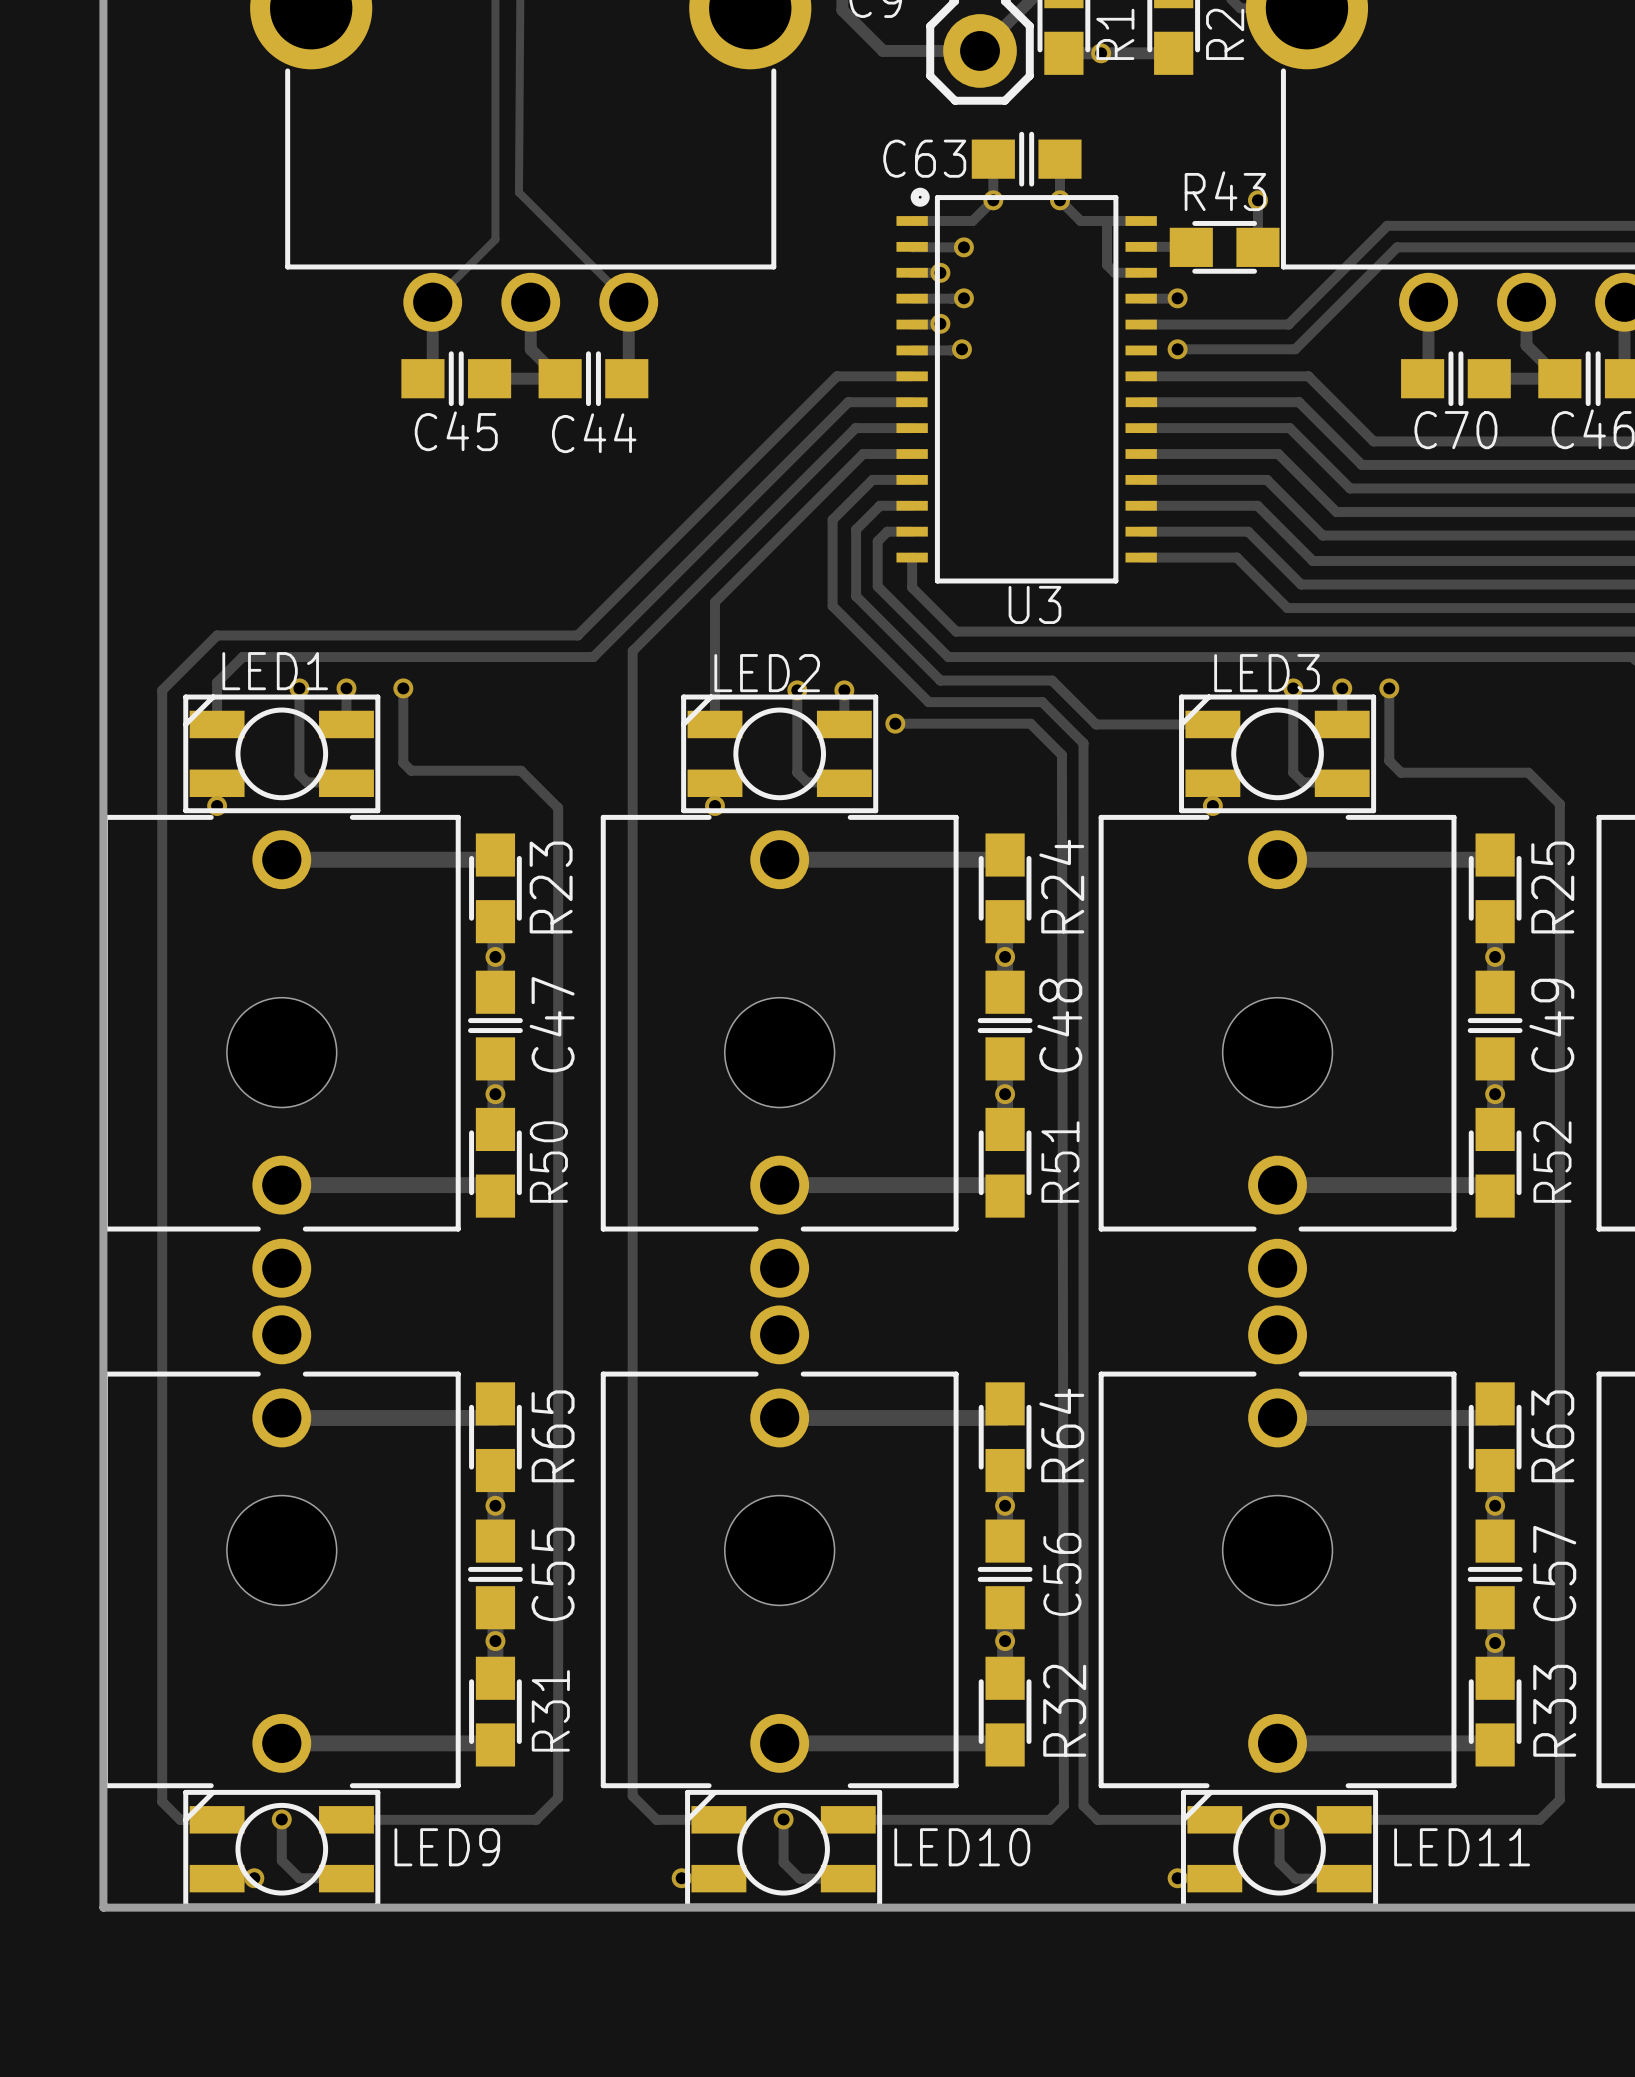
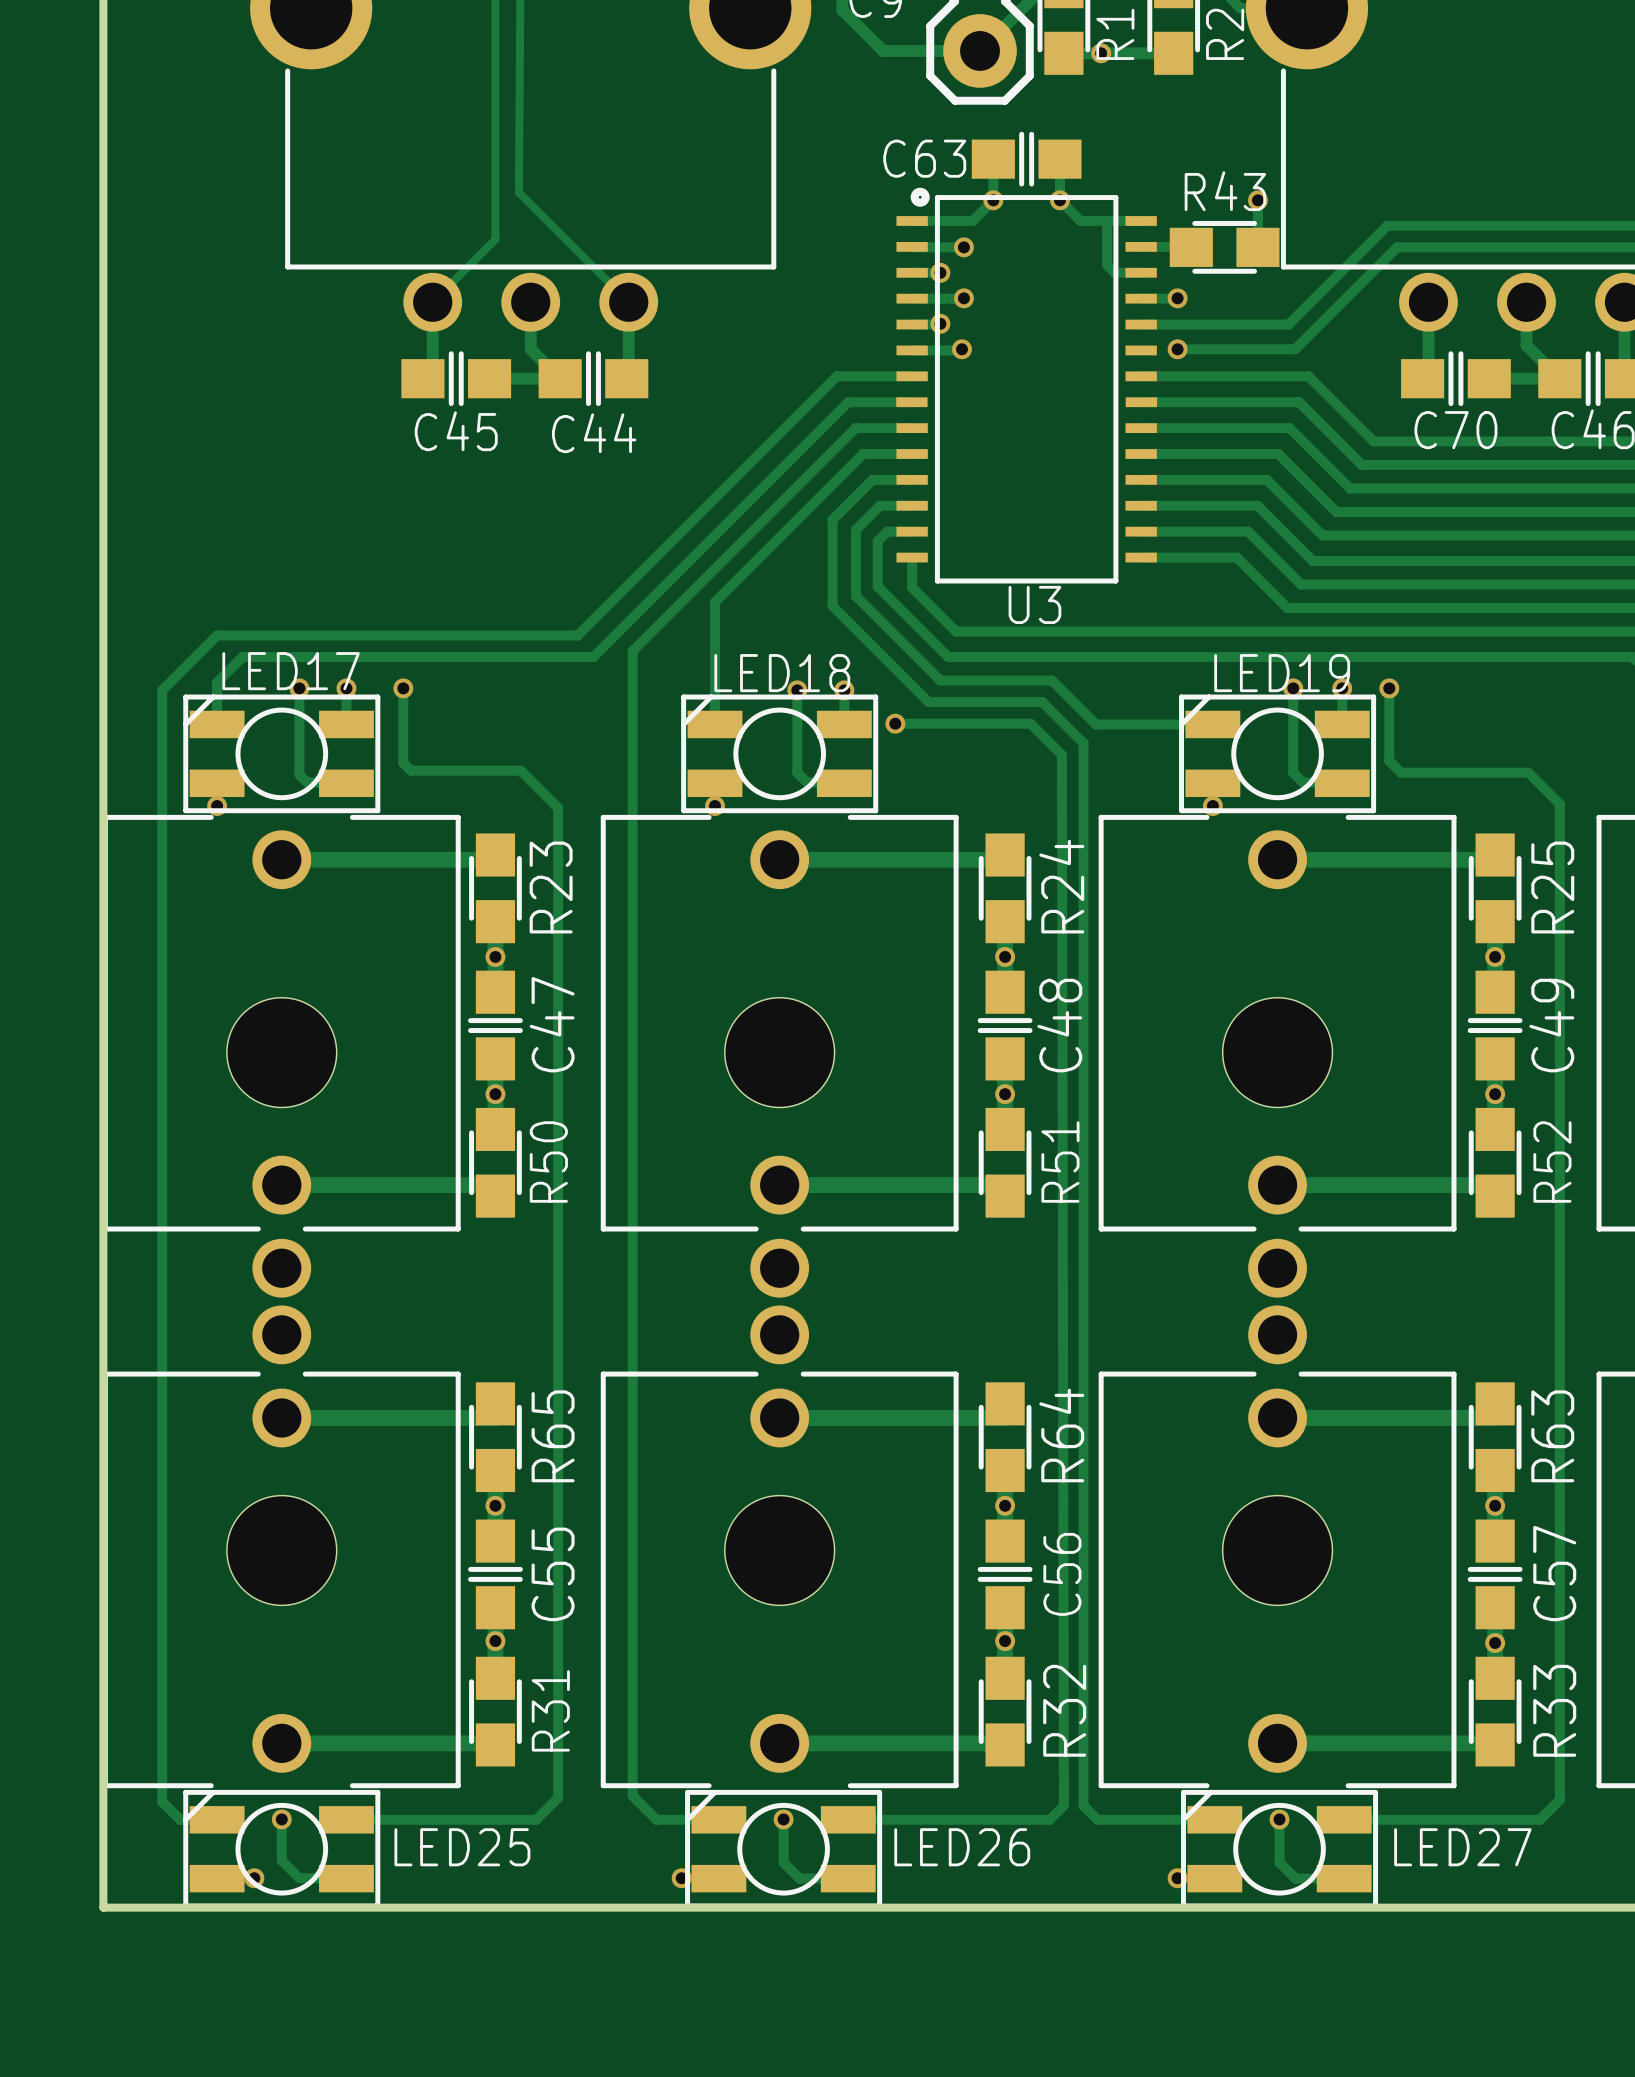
LED1 name: LED1 (275, 671) -> LED17 (291, 671)
LED2 name: LED2 (767, 673) -> LED18 (782, 673)
LED3 name: LED3 (1267, 673) -> LED19 (1282, 673)
LED9 name: LED9 (447, 1847) -> LED25 (462, 1847)
LED10 name: LED10 (962, 1847) -> LED26 (962, 1847)
LED11 name: LED11 (1462, 1847) -> LED27 (1462, 1847)

